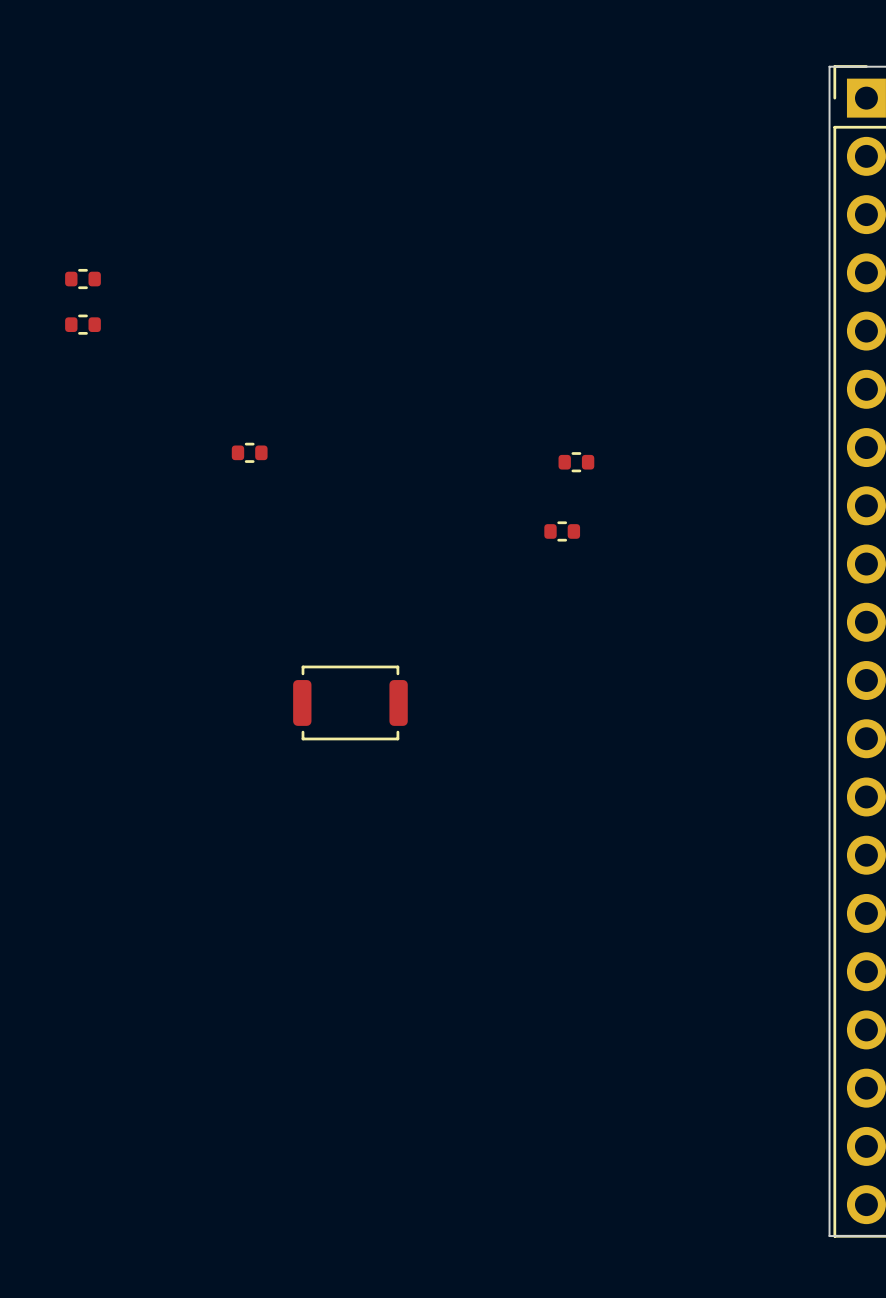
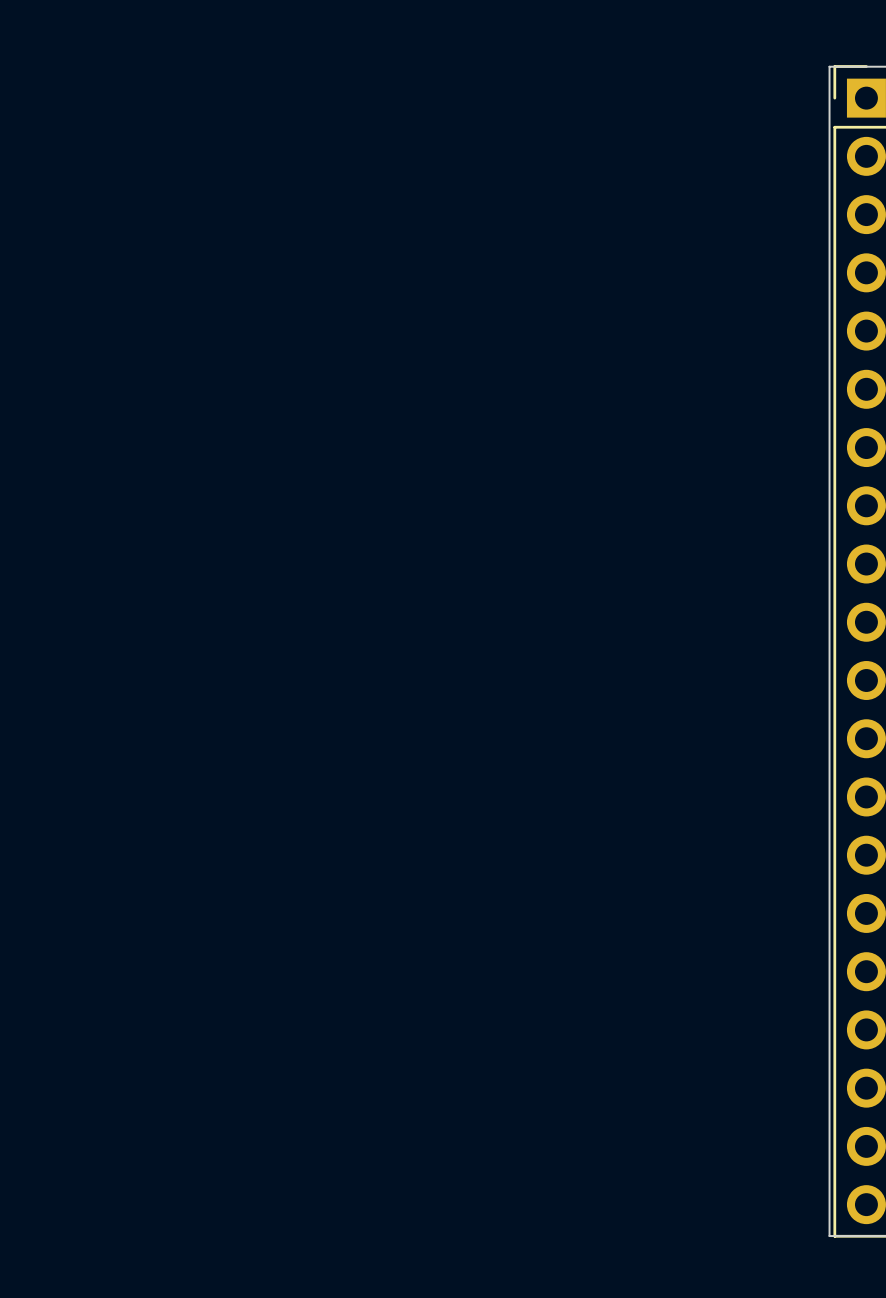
part: (82, 279) -> none
part: (82, 324) -> none
part: (249, 452) -> none
part: (576, 462) -> none
part: (562, 531) -> none
part: (350, 702) -> none

